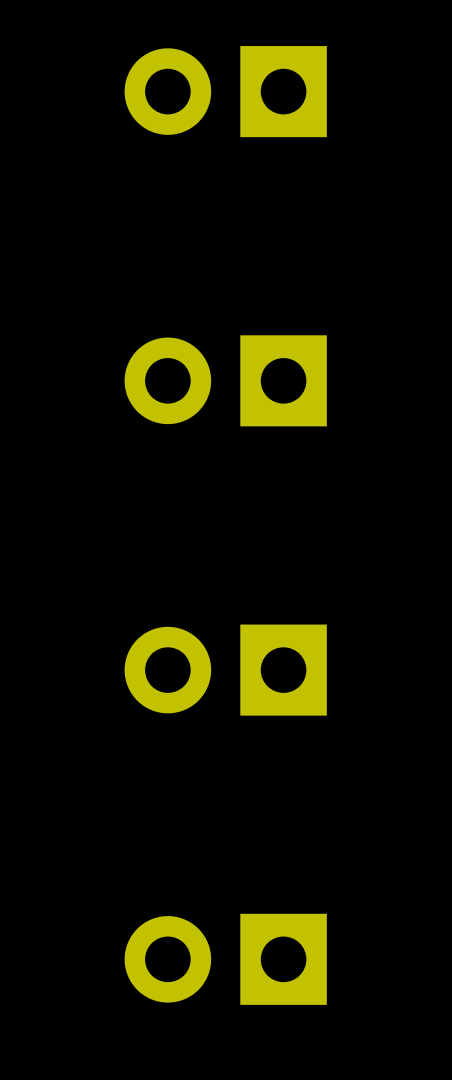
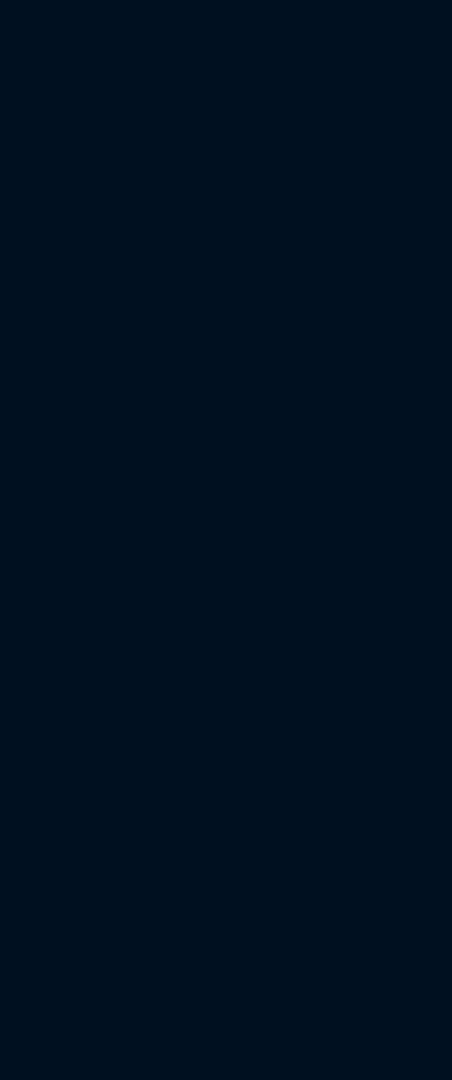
part: (225, 91) -> none
part: (225, 380) -> none
part: (225, 670) -> none
part: (225, 959) -> none

